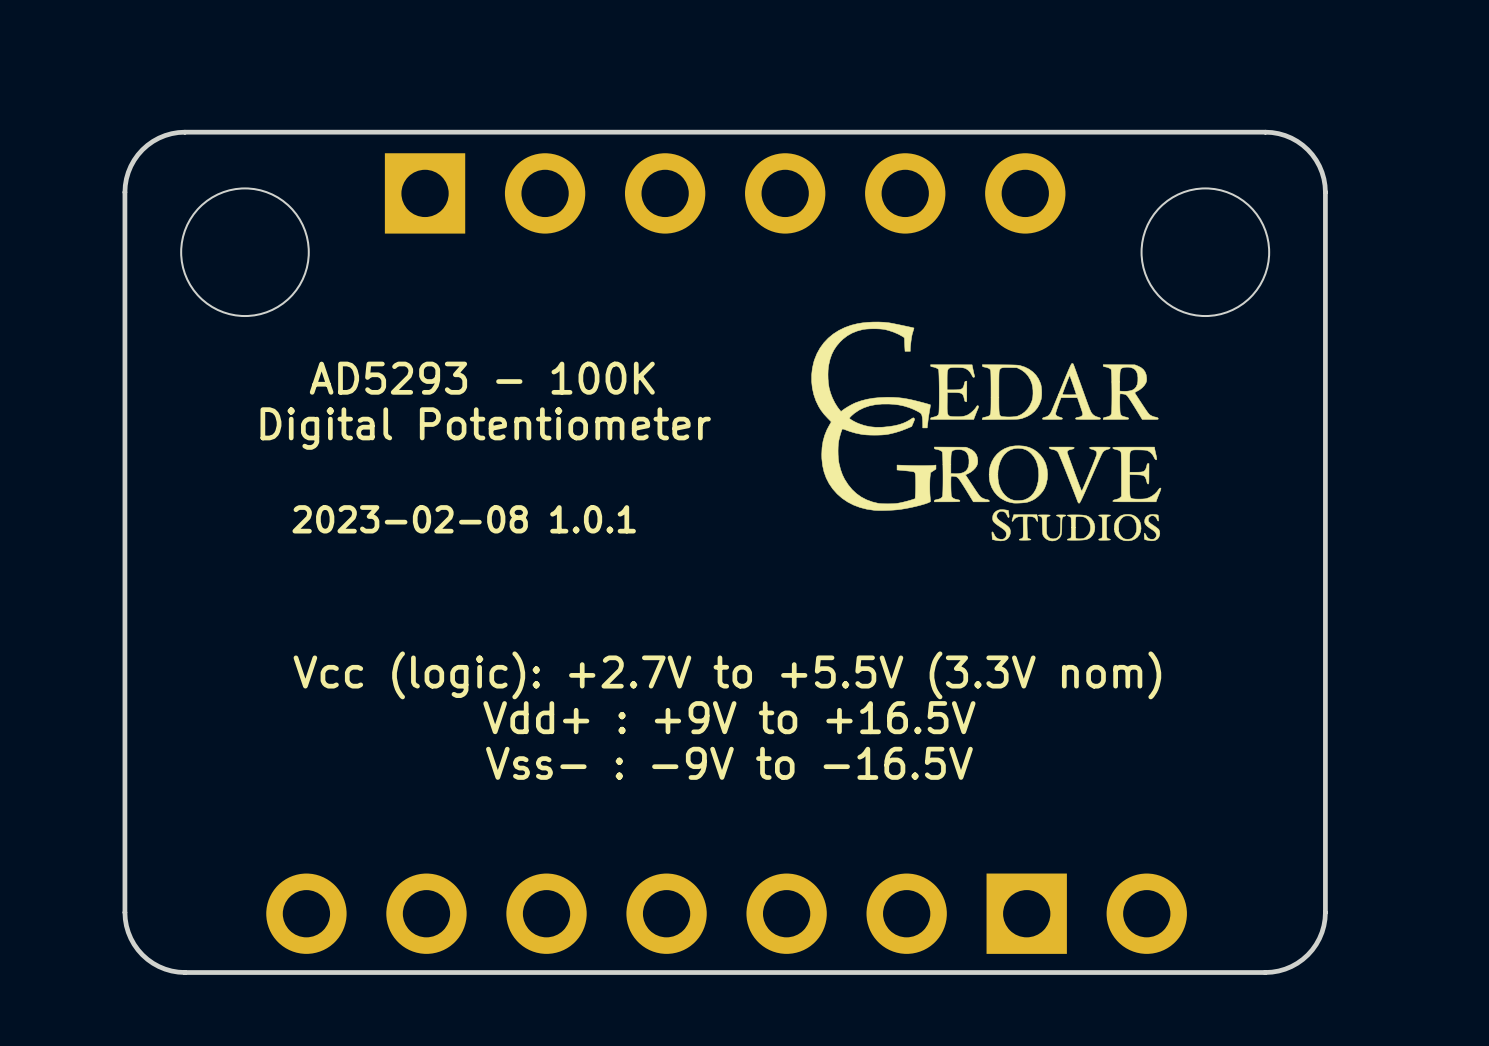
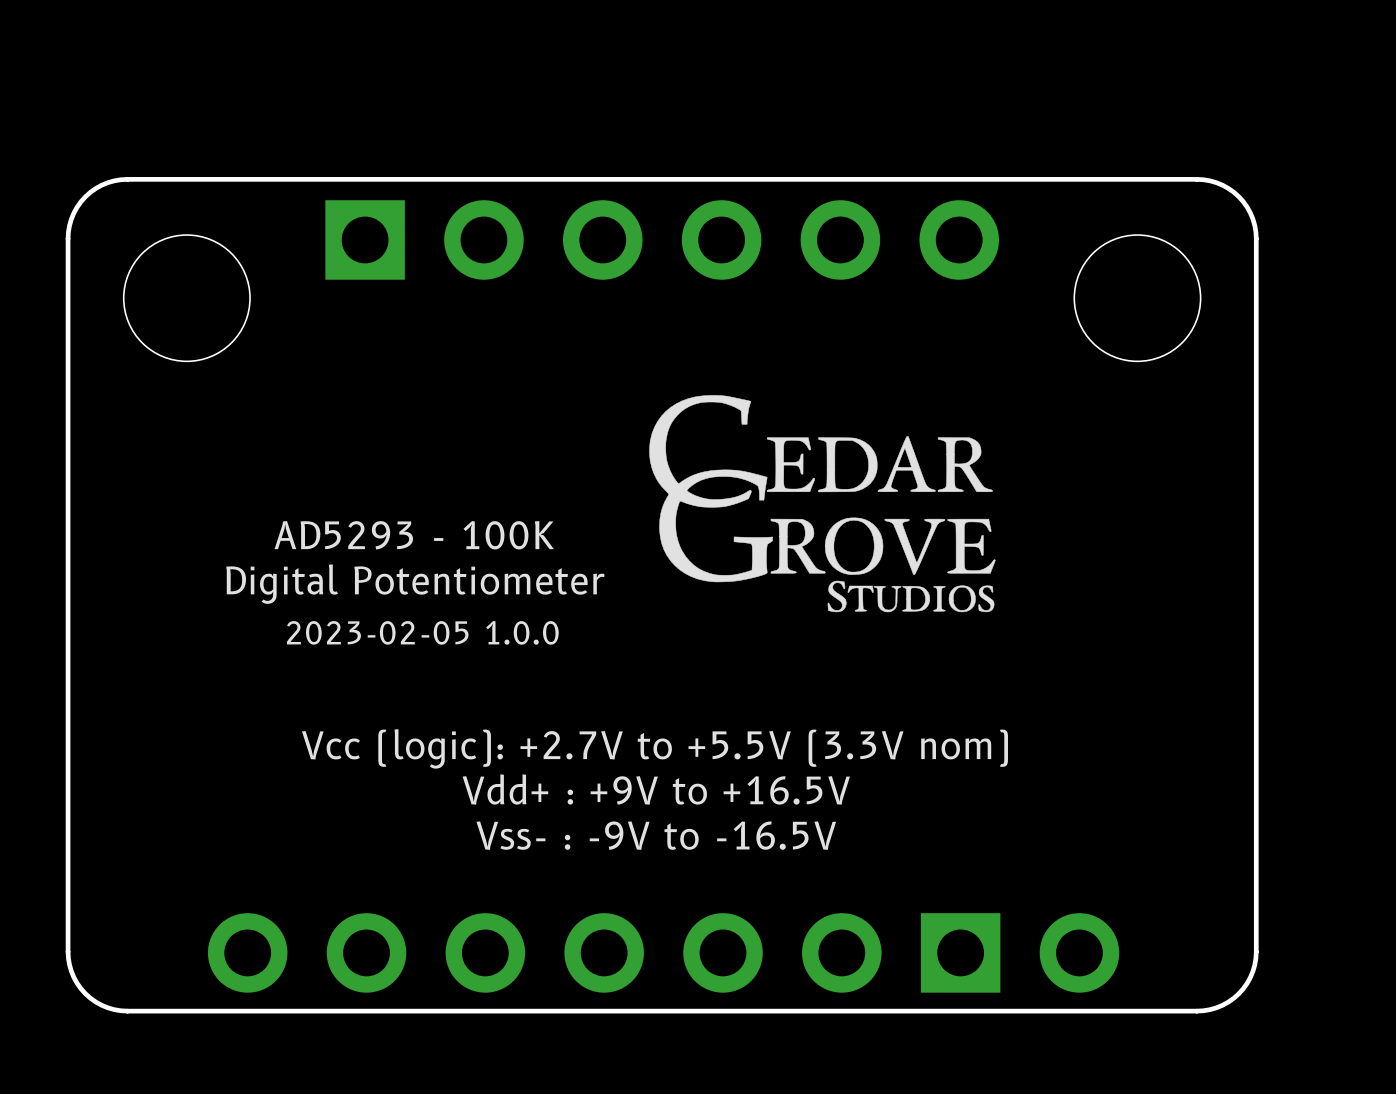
text position: AD5293 - 100K (482, 378) -> AD5293 - 100K (414, 535)
text position: Digital Potentiometer (485, 428) -> Digital Potentiometer (415, 584)
drawing position: (986, 431) -> (822, 503)
text: 2023-02-08 1.0.1 (464, 519) -> none
text: none -> 2023-02-05 1.0.0 (422, 632)
text position: Vcc (logic): +2.7V to +5.5V (3.3V nom) (727, 675) -> Vcc (logic): +2.7V to +5.5V (3.3V nom) (654, 748)
text position: Vdd+ : +9V to +16.5V (729, 717) -> Vdd+ : +9V to +16.5V (656, 789)
text position: Vss- : -9V to -16.5V (729, 763) -> Vss- : -9V to -16.5V (656, 835)

